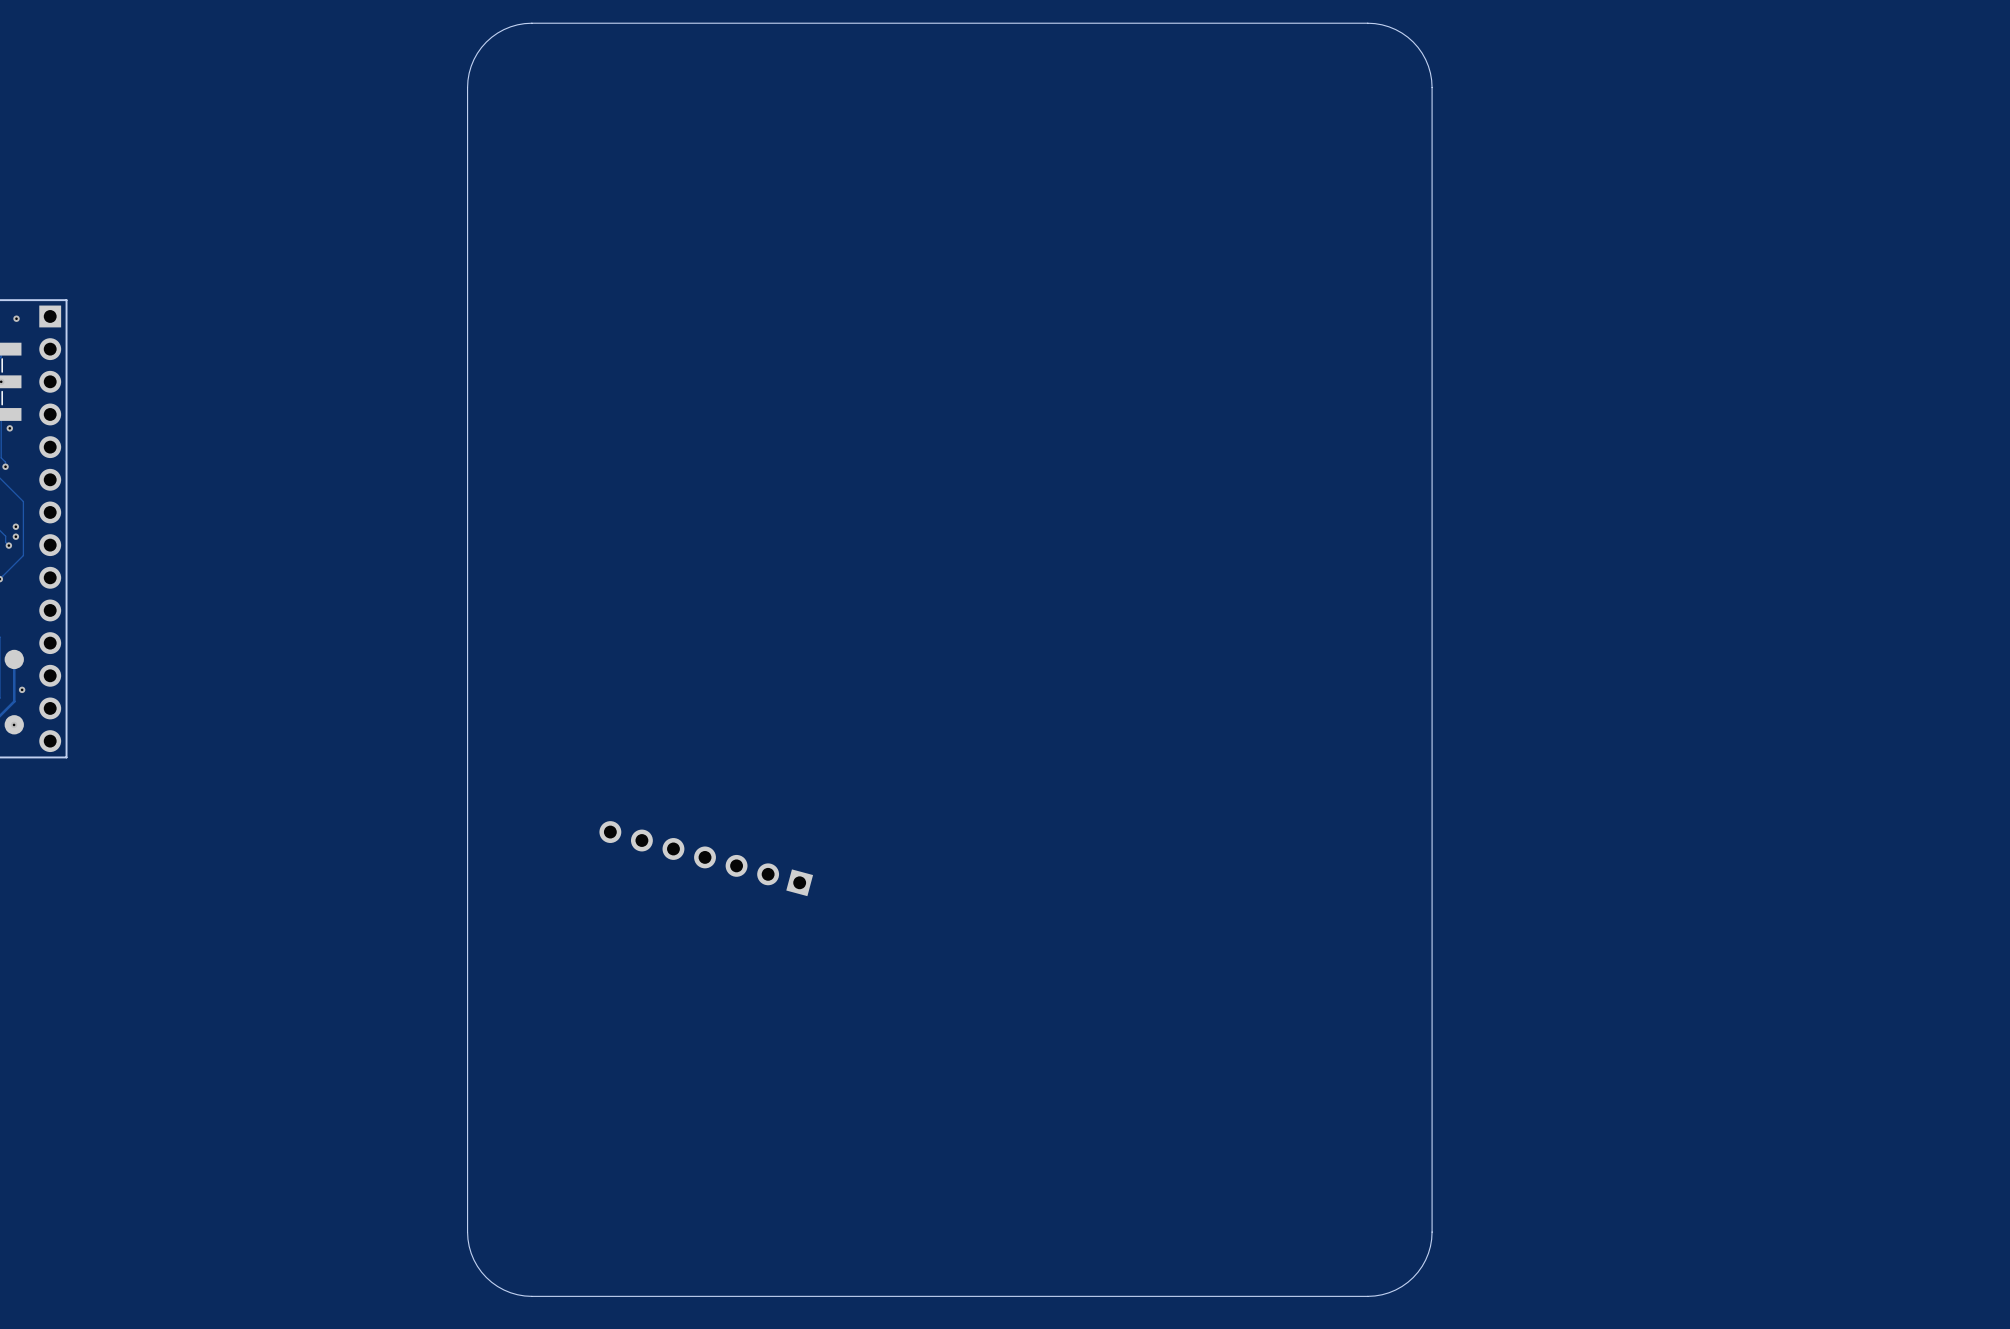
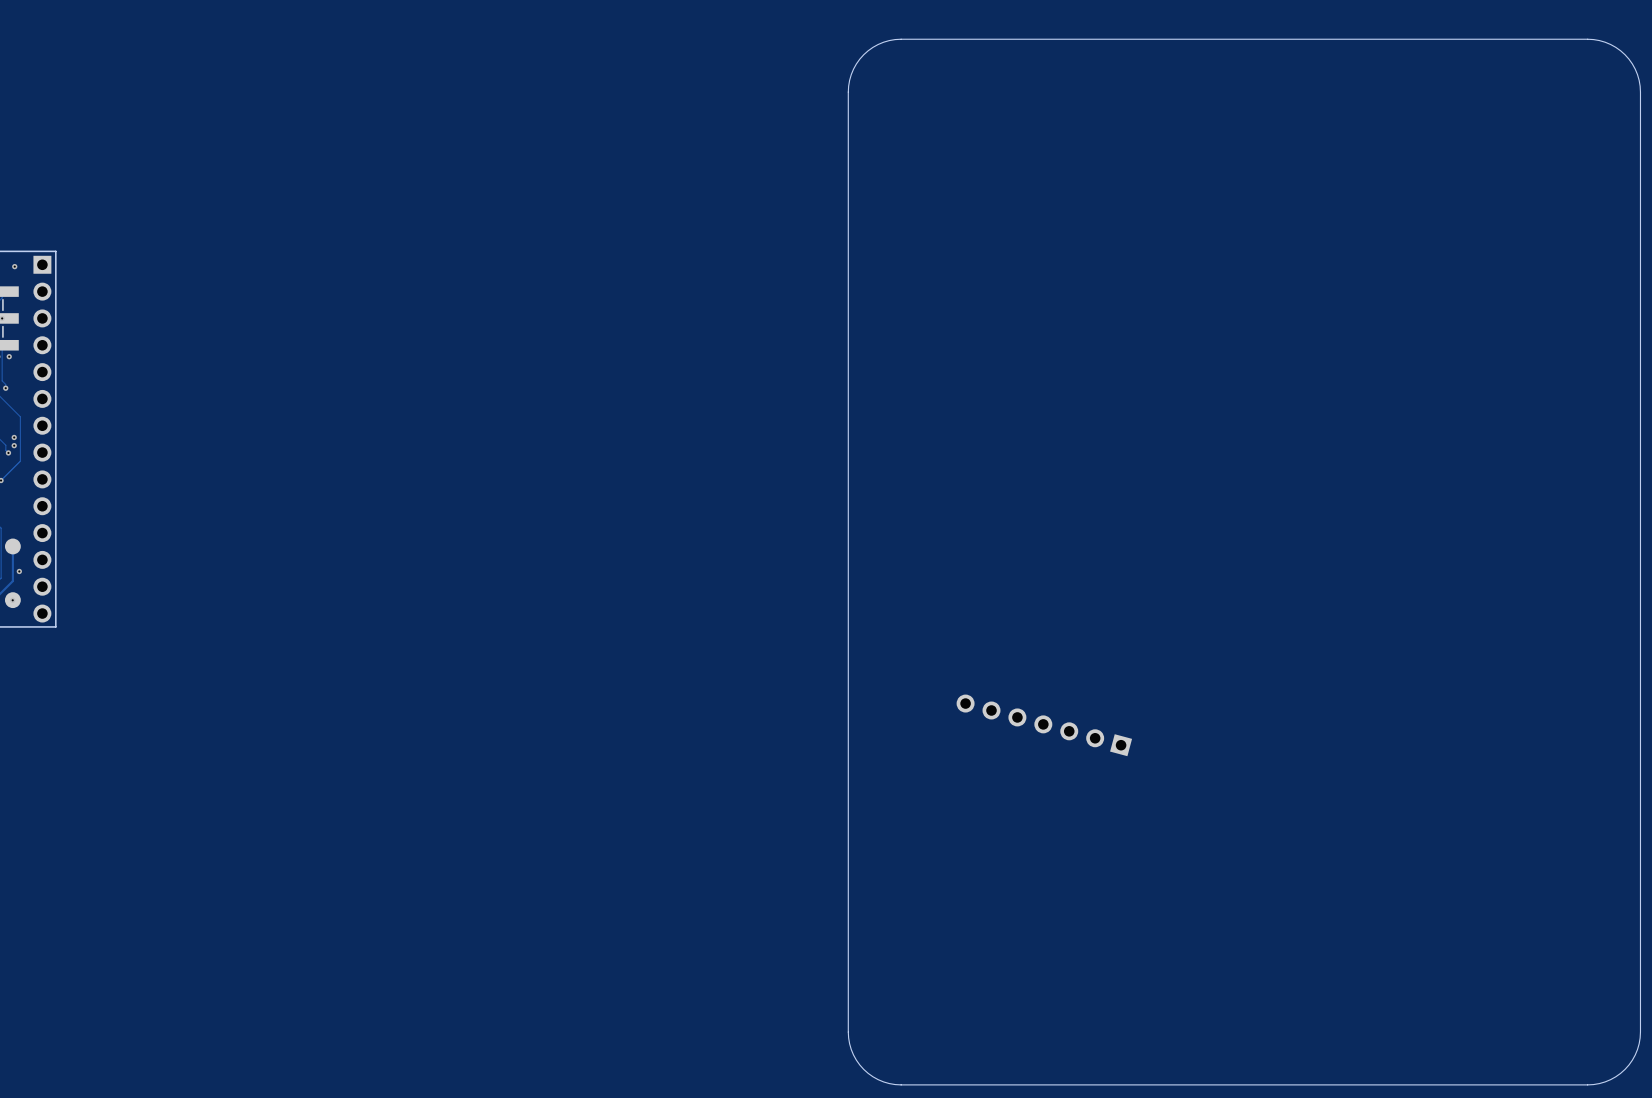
board edge: (1367, 23) (531, 23) (517, 24) (503, 29) (491, 37) (477, 53) (471, 66) (467, 87) (467, 1232) (471, 1253) (477, 1266) (486, 1277) (497, 1286) (510, 1292) (531, 1296) (1367, 1296) (1389, 1292) (1401, 1286) (1413, 1277) (1422, 1266) (1430, 1246) (1432, 1232) (1432, 87) (1428, 66) (1422, 53) (1413, 42) (1395, 29) (1382, 24) (1367, 23) -> none
board edge: none -> (1587, 39) (901, 39) (878, 44) (868, 50) (856, 63) (851, 74) (848, 92) (848, 1032) (851, 1049) (856, 1060) (873, 1076) (883, 1081) (901, 1084) (1587, 1084) (1605, 1081) (1615, 1076) (1632, 1060) (1639, 1043) (1640, 1032) (1640, 92) (1637, 74) (1625, 54) (1610, 44) (1587, 39)
part: (706, 858) -> none
part: none -> (1044, 725)

